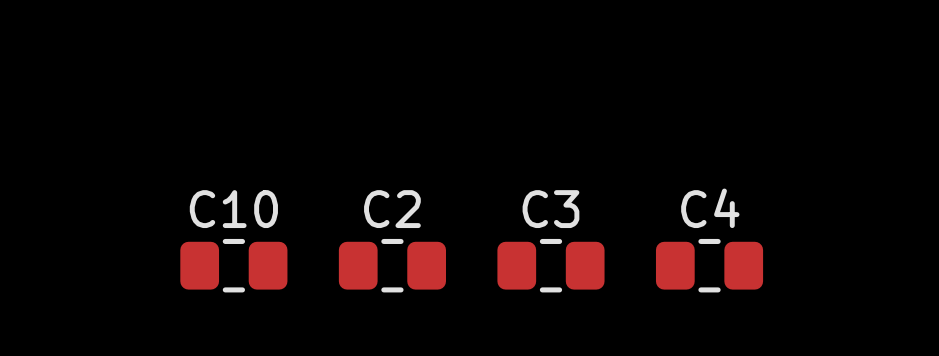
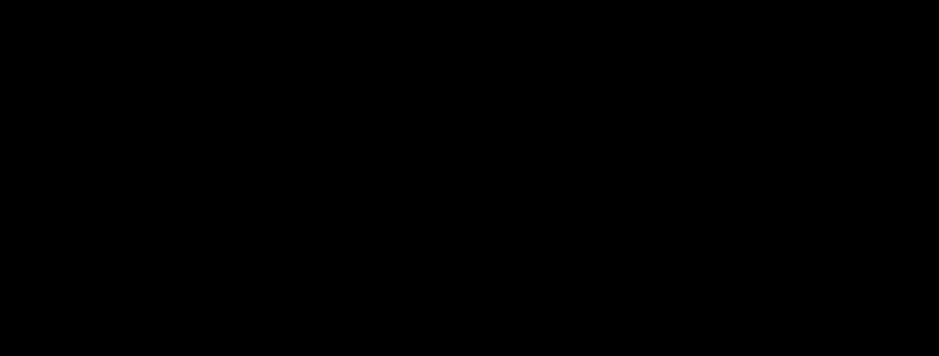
C10: (233, 265) -> none
C2: (392, 265) -> none
C3: (550, 265) -> none
C4: (709, 265) -> none

